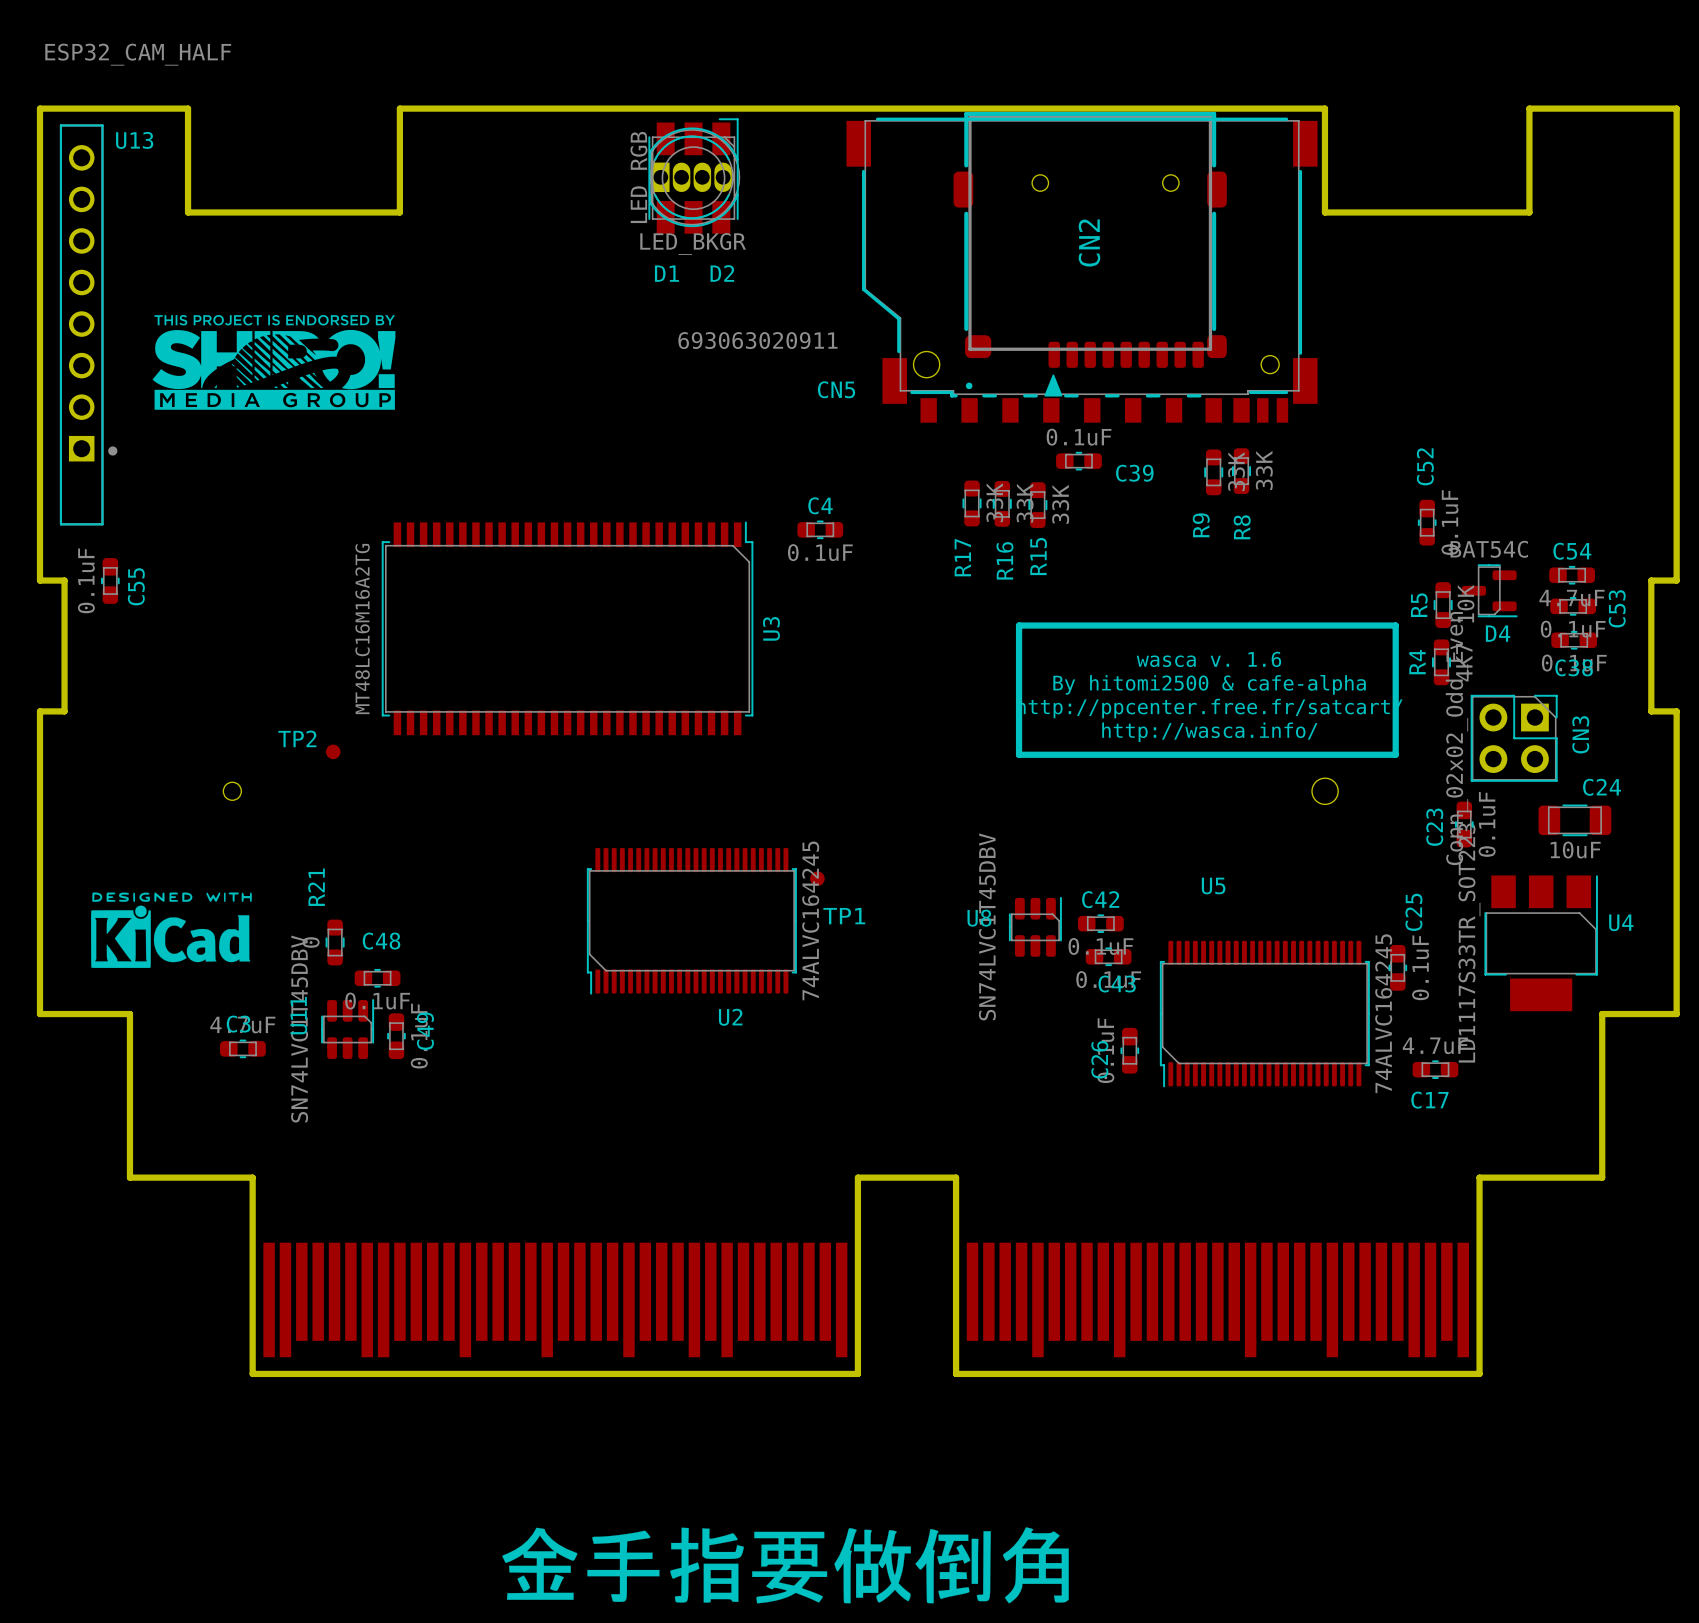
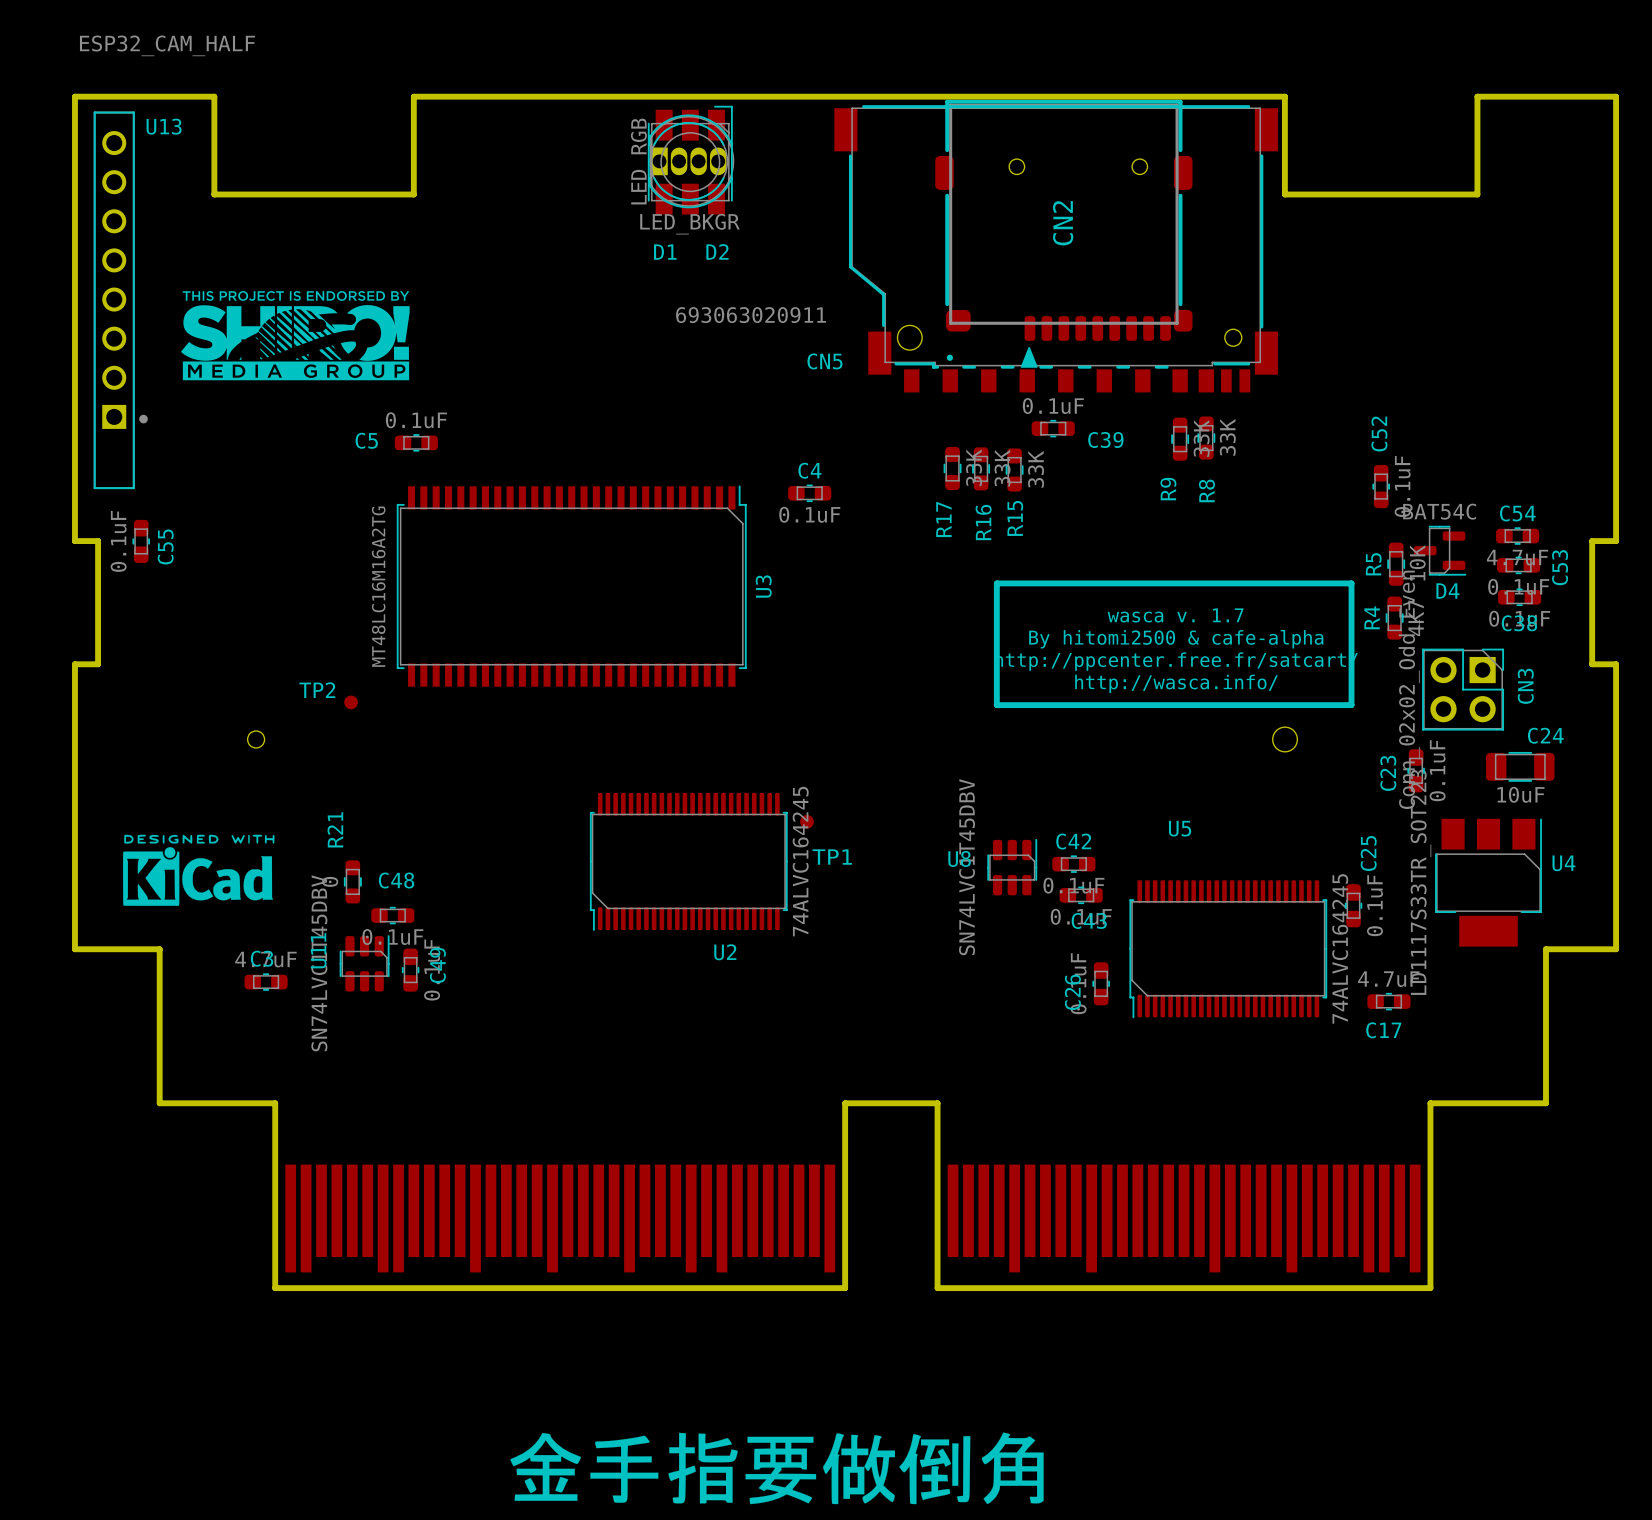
C5: none -> 0.1uF (416, 442)
text: wasca v. 1.6 (1208, 659) -> wasca v. 1.7 (1175, 615)

